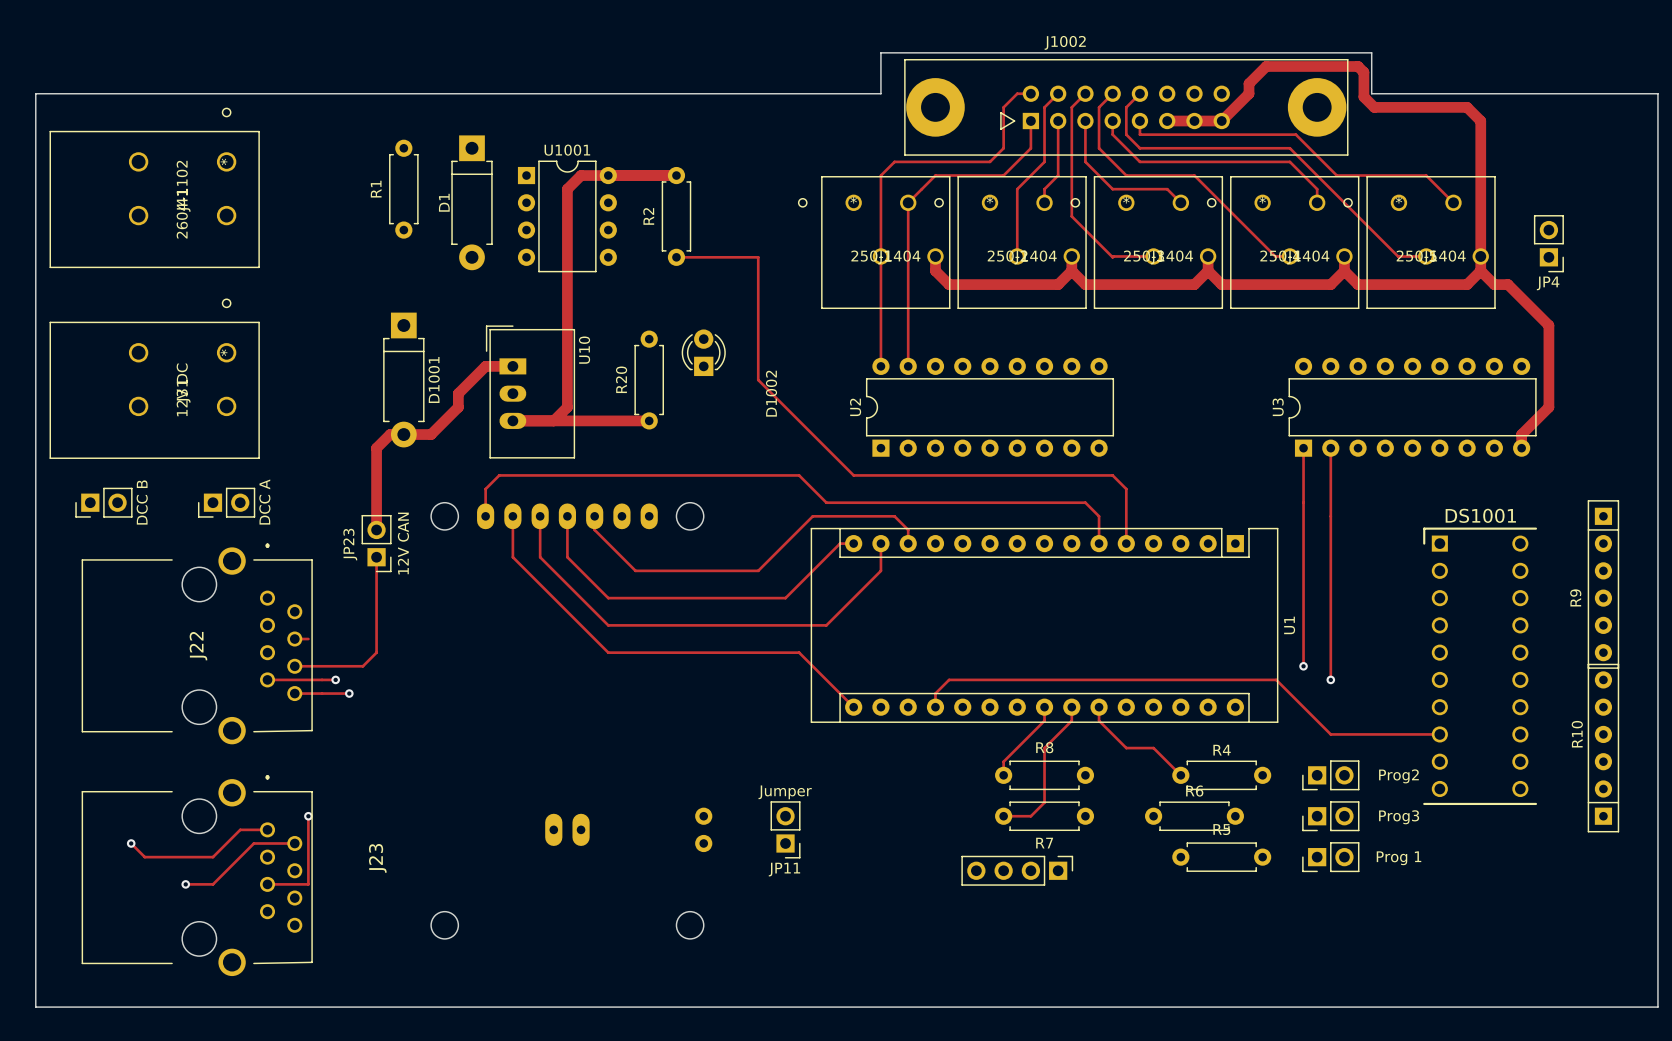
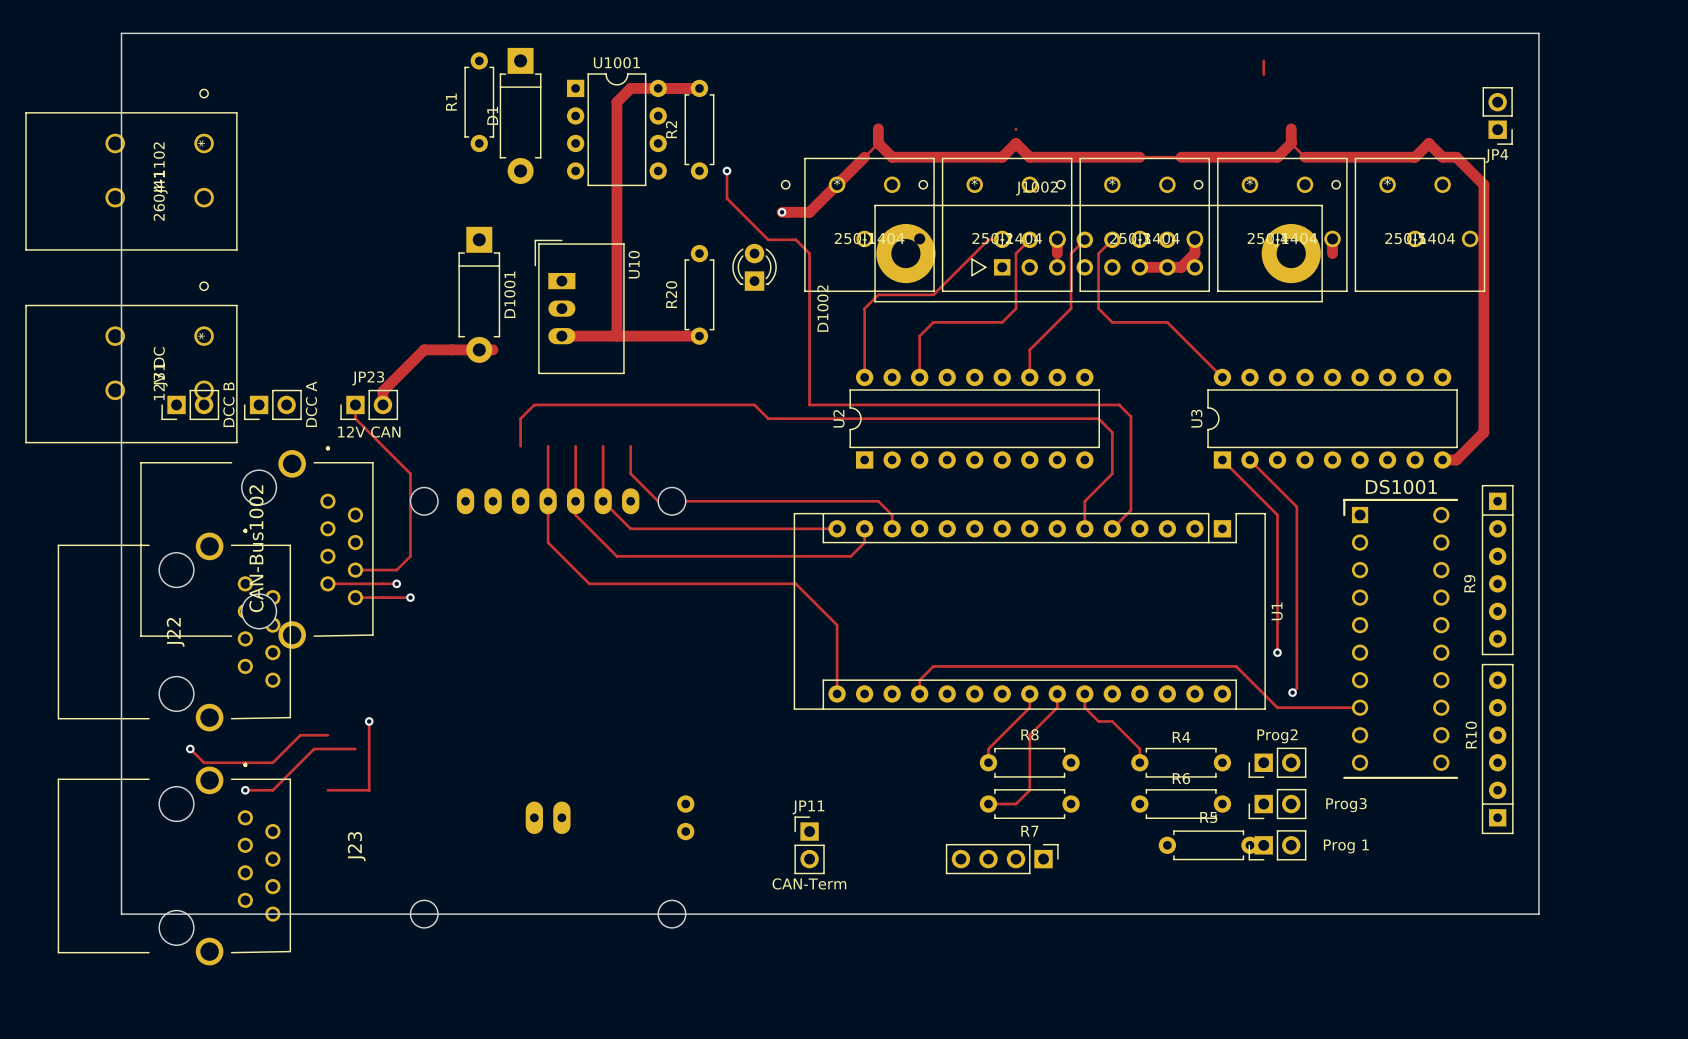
board edge: (880, 52) (880, 93) (35, 93) (35, 1007) (1657, 1007) (1657, 93) (1371, 93) (1371, 52) -> (864, 33) (121, 33) (121, 914) (1538, 914) (1538, 33) (1360, 33)
track: none -> (1263, 60) (1263, 74)
track: (1030, 93) (1017, 93) (1003, 107) (1003, 148) (990, 161) (894, 161) -> none
track: (1058, 93) (1044, 107) (1044, 161) (1017, 189) (1017, 256) -> none
track: (1085, 93) (1071, 107) (1071, 216) (1112, 257) (1153, 256) -> none
track: (1112, 93) (1099, 107) (1099, 148) (1126, 175) -> none
track: (1139, 93) (1126, 107) (1126, 134) (1139, 148) (1289, 148) (1303, 161) -> none
track: none -> (699, 88) (630, 88) (616, 102) (616, 336)
J1002 position: (1126, 107) -> (1098, 253)
track: (1030, 121) (1030, 147) -> none
track: (1058, 121) (1058, 175) (1044, 189) (1044, 202) -> none
track: (1085, 121) (1085, 161) (1112, 189) (1167, 189) (1180, 202) -> none
track: (1112, 121) (1112, 134) (1139, 161) (1289, 161) (1317, 189) (1317, 202) -> none
track: (1139, 121) (1139, 134) (1295, 134) (1336, 175) -> none
track: (1167, 121) (1221, 121) (1249, 93) (1249, 83) (1266, 66) (1358, 66) (1363, 72) (1363, 96) (1374, 107) (1467, 107) (1480, 121) (1480, 270) -> none
track: (1030, 148) (1003, 175) -> (1112, 157) (1029, 157) (1016, 143) (1002, 157) (988, 157)
track: (676, 175) (581, 175) (567, 189) (567, 407) (553, 420) (512, 420) -> none
track: (880, 175) (880, 325) -> (864, 157) (809, 212) (782, 212)
track: (935, 175) (908, 202) (908, 366) -> (919, 157) (892, 157) (878, 143) (878, 128)
track width: thin (935, 175) (1003, 175) -> thick (919, 157) (988, 157)
track width: thin (1126, 175) (1153, 175) -> thick (1112, 157) (1139, 157)
track: (1194, 175) (1275, 256) (1289, 256) -> (1181, 157) (1277, 157) (1291, 143) (1291, 128)
track: (1317, 175) (1398, 257) (1426, 256) -> (1305, 157) (1324, 157)
track width: thin (1336, 175) (1426, 175) -> thick (1324, 157) (1415, 157)
track: (1426, 175) (1453, 202) -> (1415, 157) (1428, 143) (1442, 157) (1456, 157) (1483, 184) (1483, 432) (1456, 459) (1442, 459)
R1 position: (403, 189) -> (479, 102)
via: none -> (727, 170)
D1 position: (471, 202) -> (520, 115)
U1001 position: (567, 216) -> (616, 129)
R2 position: (676, 216) -> (699, 129)
via: none -> (782, 212)
JP4 position: (1548, 243) -> (1497, 115)
track: (935, 256) (935, 270) (949, 284) (1058, 284) (1071, 270) (1085, 284) (1153, 284) -> none
track: (676, 257) (758, 257) (758, 380) (853, 475) (1112, 475) (1126, 489) (1126, 543) -> (727, 170) (727, 198) (768, 239) (795, 239) (809, 253) (809, 404) (1119, 404) (1130, 416) (1130, 510) (1112, 528)
track: none -> (1002, 239) (988, 239) (933, 294) (878, 294) (864, 308)
track: none -> (1029, 239) (1016, 253) (1016, 308) (1002, 322) (933, 322) (919, 336) (919, 377)
track: none -> (1084, 239) (1071, 253) (1071, 308) (1029, 349) (1029, 377)
track: none -> (1112, 239) (1098, 253) (1098, 308) (1112, 322) (1167, 322) (1222, 377)
track: (1208, 270) (1221, 284) (1330, 284) (1344, 270) (1358, 284) (1467, 284) (1480, 270) -> none
track: (1480, 270) (1494, 284) (1508, 284) (1548, 325) (1548, 407) (1521, 434) (1521, 448) -> none
track: none -> (561, 336) (699, 336)
D1002 position: (703, 352) -> (754, 267)
track: (485, 366) (458, 393) (458, 407) (431, 434) (390, 434) (376, 448) (376, 529) -> (465, 349) (424, 349) (382, 391) (382, 404)
track: none -> (864, 349) (864, 377)
D1001 position: (403, 380) -> (479, 294)
R20 position: (649, 380) -> (699, 294)
U10 position: (530, 391) -> (579, 306)
U2 position: (990, 407) -> (974, 418)
U3 position: (1412, 407) -> (1332, 418)
track: none -> (355, 404) (355, 418) (410, 473) (410, 556) (396, 570) (355, 570)
track: none -> (534, 404) (520, 418) (520, 446)
track width: thick (553, 420) (649, 420) -> thin (534, 404) (630, 404)
track: (1303, 448) (1303, 666) -> none
track: (1330, 448) (1330, 679) -> none
track: none -> (548, 446) (548, 501)
track: none -> (575, 446) (575, 501)
track: none -> (603, 446) (603, 501) (630, 528) (823, 528)
track: none -> (630, 446) (630, 473) (658, 501) (795, 501)
track: none -> (1222, 459) (1277, 515) (1277, 652)
track: none -> (1249, 459) (1296, 506) (1296, 688) (1292, 692)
part position: (103, 502) -> (190, 404)
part position: (226, 502) -> (272, 404)
track: (485, 516) (485, 489) (499, 475) (799, 475) (826, 502) (1085, 502) (1099, 516) -> (630, 404) (754, 404) (768, 418) (1098, 418) (1112, 432) (1112, 473) (1084, 501)
track: (512, 516) (512, 557) (608, 652) (799, 652) (853, 707) -> none
track: (540, 516) (540, 557) (608, 625) (826, 625) (880, 570) (880, 557) -> none
track: (812, 516) (758, 570) -> (864, 542) (850, 556) (740, 556)
JP23 rotation: 0° (376, 543) -> 90° clockwise (369, 404)
JP23 position: (376, 543) -> (369, 404)
track: (840, 543) (785, 598) -> (837, 693) (837, 625) (795, 583) (768, 583)
track: (376, 557) (376, 652) (362, 666) (294, 666) -> none
CAN-Bus1002: none -> (256, 547)
R9 position: (1603, 584) -> (1497, 570)
via: none -> (396, 583)
via: none -> (410, 597)
track: (294, 639) (308, 639) -> none
via position: (1303, 666) -> (1277, 652)
DS1001 position: (1480, 666) -> (1400, 638)
track: (267, 679) (335, 679) -> (327, 583) (396, 583)
via: (335, 679) -> none
track: (1249, 679) (1276, 679) (1330, 734) (1439, 734) -> (1236, 666) (1277, 707) (1360, 707)
via: (1330, 679) -> none
track: (294, 693) (349, 693) -> (355, 597) (410, 597)
via: (349, 693) -> none
via: none -> (1292, 692)
via: none -> (369, 721)
track: (1112, 734) (1126, 748) (1153, 748) (1180, 775) -> (1098, 721) (1112, 721) (1139, 748) (1139, 762)
R10 position: (1603, 748) -> (1497, 748)
via: none -> (190, 748)
R4 position: (1221, 775) -> (1181, 762)
part position: (1330, 775) -> (1277, 762)
part value position: Prog2 (1398, 776) -> Prog2 (1277, 736)
JP11 value: Jumper (785, 792) -> CAN-Term (809, 883)
track: (308, 816) (308, 884) (267, 884) -> (369, 721) (369, 790) (327, 790)
via position: (308, 816) -> (245, 790)
part position: (1330, 816) -> (1277, 804)
track: (267, 829) (240, 829) (212, 857) (144, 857) (131, 843) -> (327, 735) (300, 735) (272, 762) (204, 762) (190, 748)
JP11 rotation: 0° (785, 829) -> 180° (809, 845)
JP11 position: (785, 829) -> (809, 845)
via: (131, 843) -> none
track: (294, 843) (253, 843) (212, 884) (185, 884) -> (355, 748) (314, 748) (272, 790) (245, 790)
part position: (1330, 857) -> (1277, 845)
via: (185, 884) -> none

